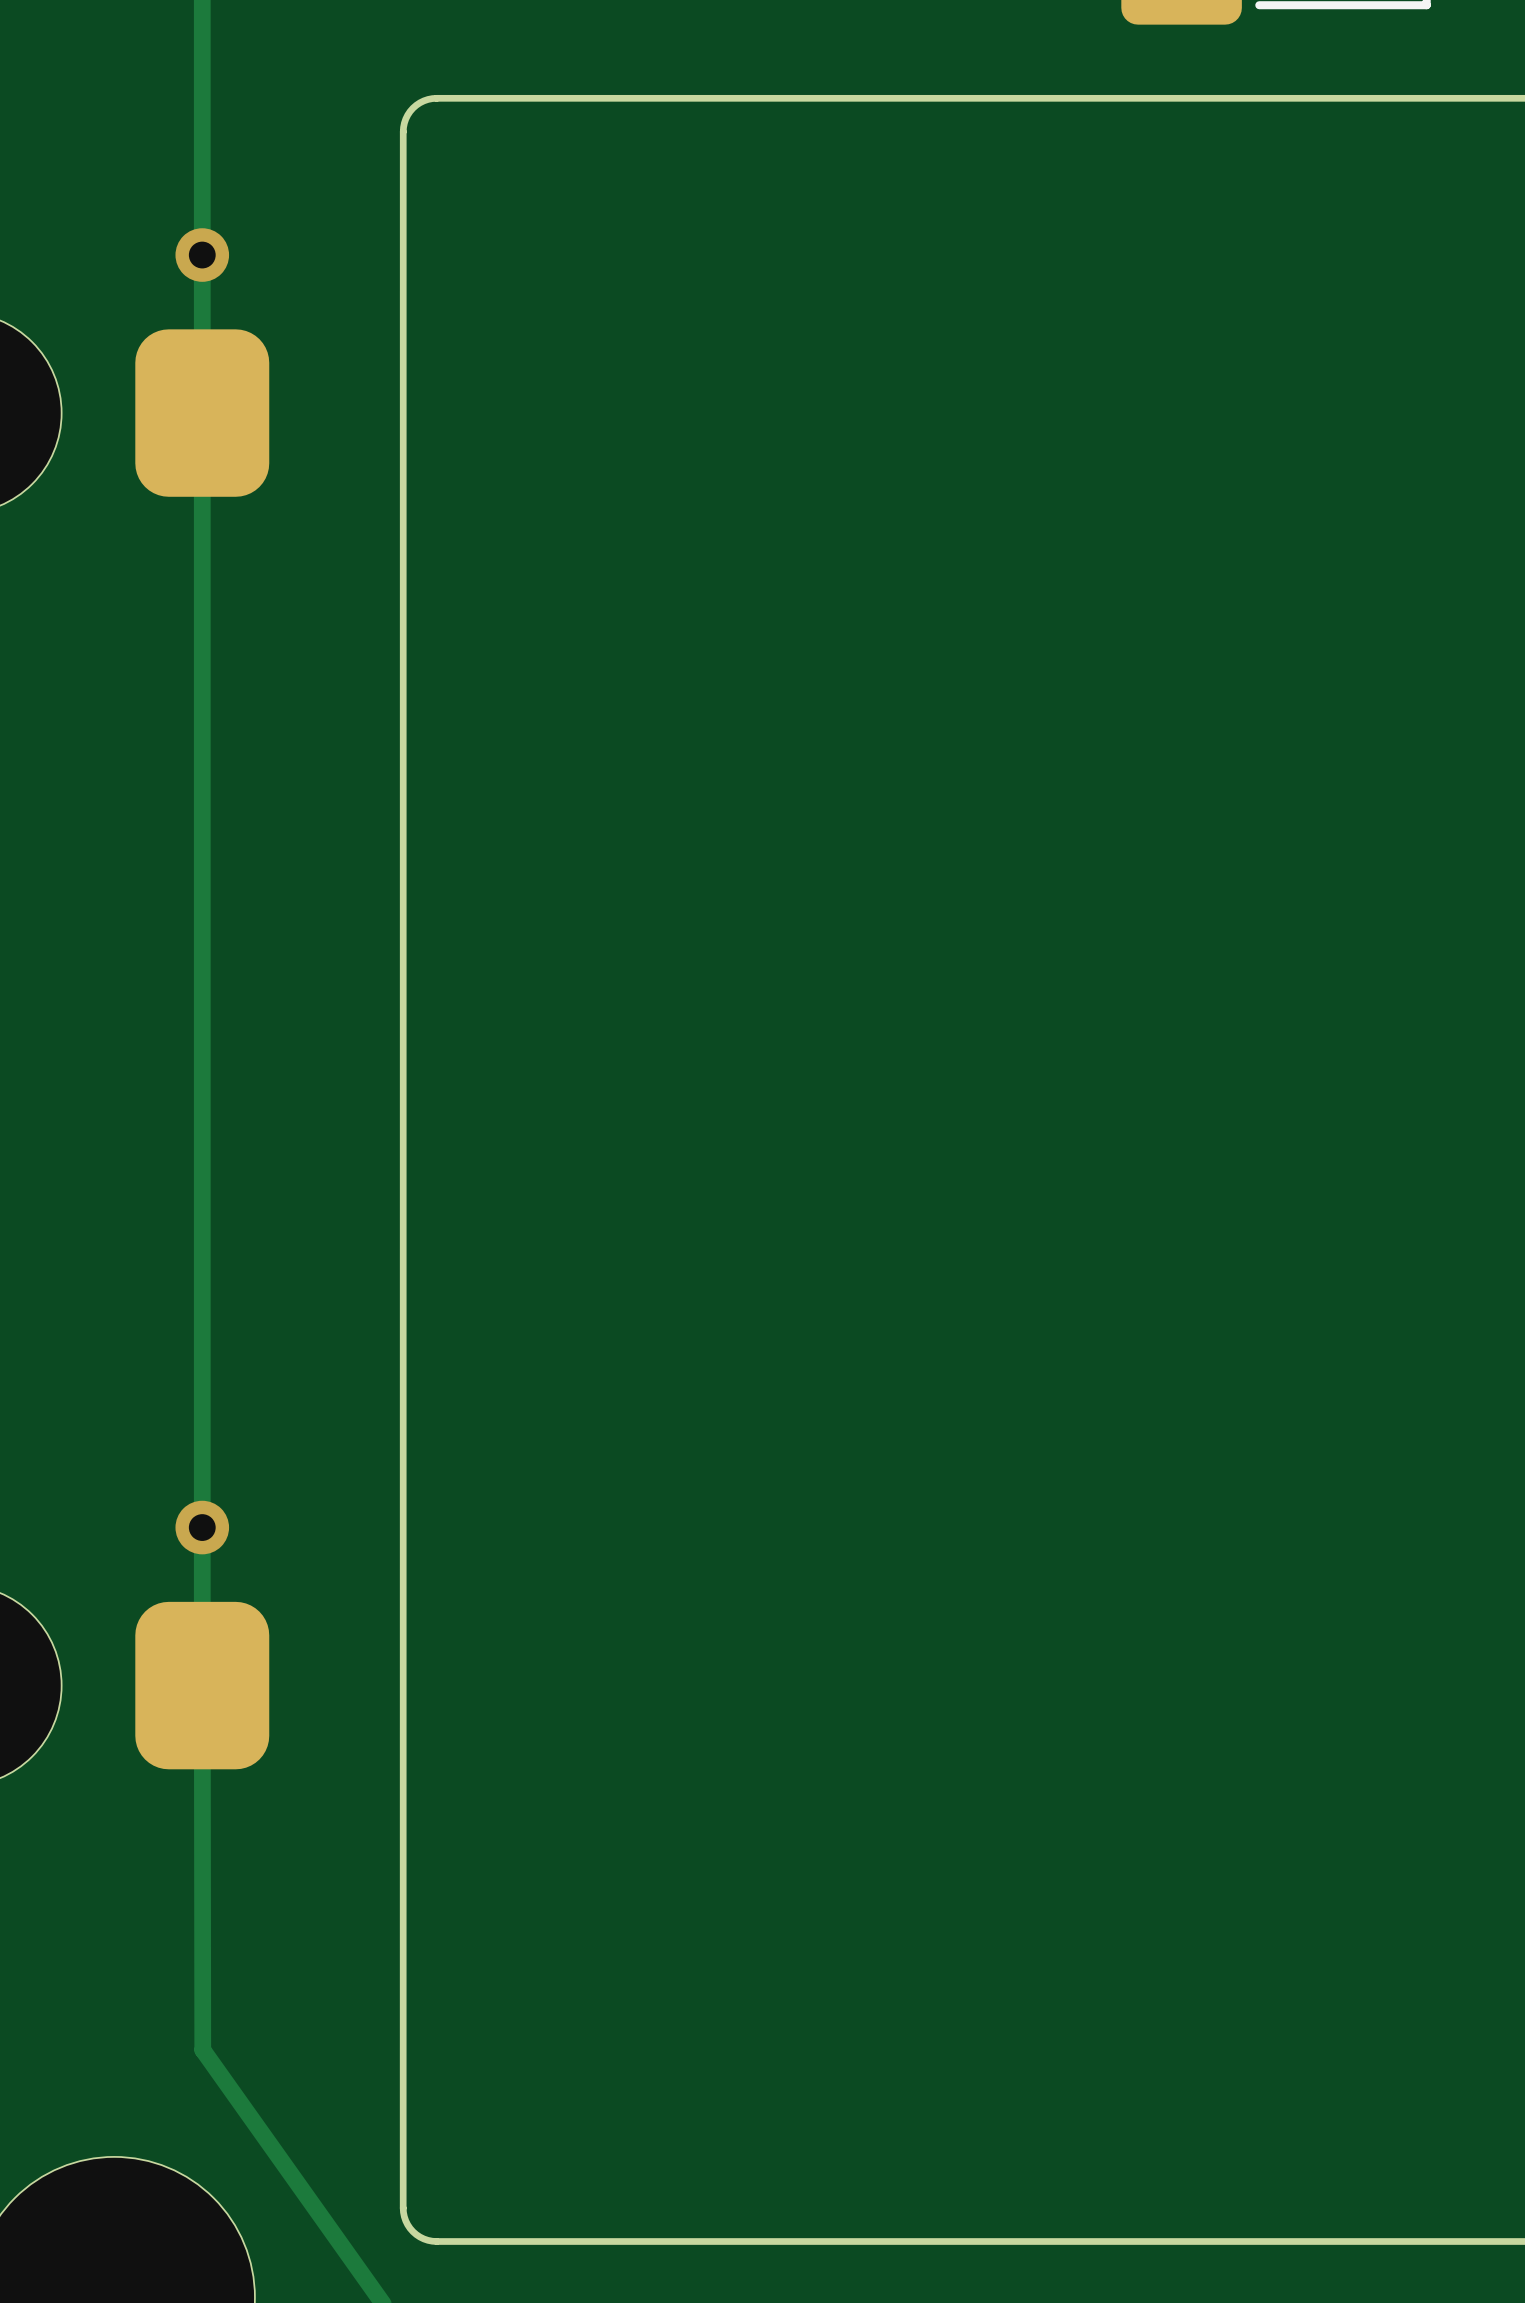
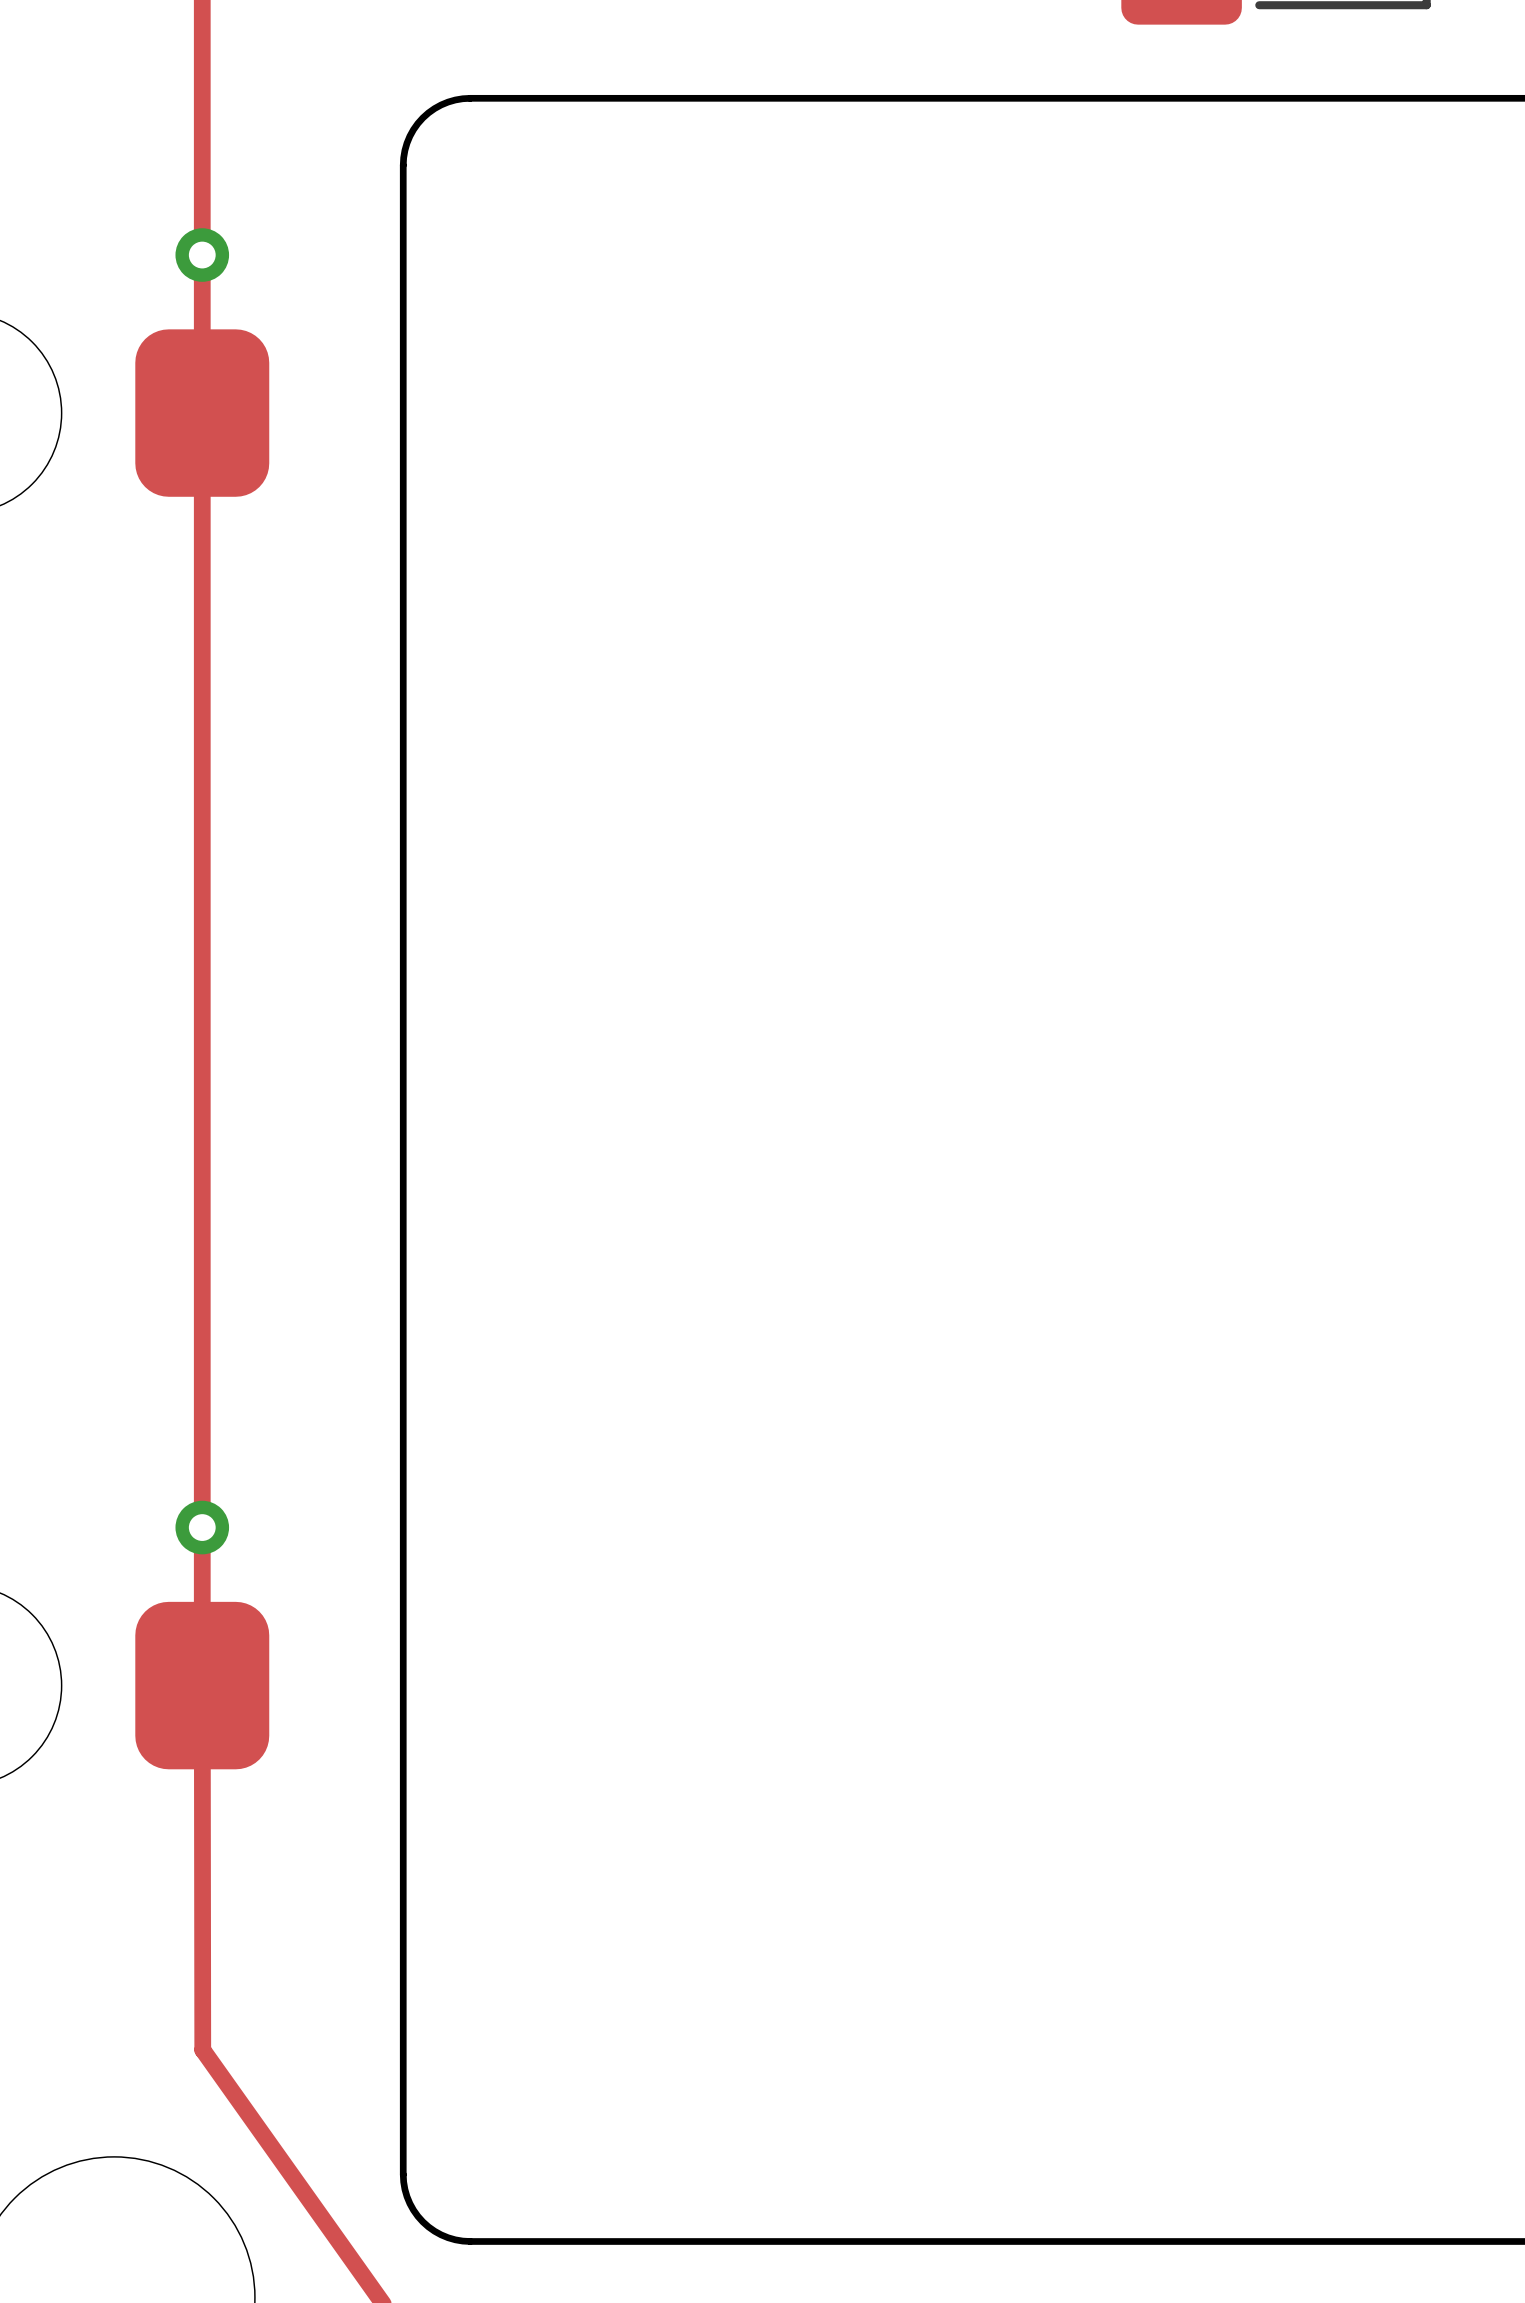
board edge: (470, 98) (432, 98) (419, 102) (407, 115) (403, 131) (403, 2208) (407, 2224) (419, 2237) (432, 2241) (470, 2241) -> (470, 98) (448, 102) (434, 108) (422, 117) (413, 129) (407, 143) (403, 165) (403, 2174) (407, 2196) (413, 2210) (422, 2221) (434, 2231) (448, 2237) (470, 2241)

